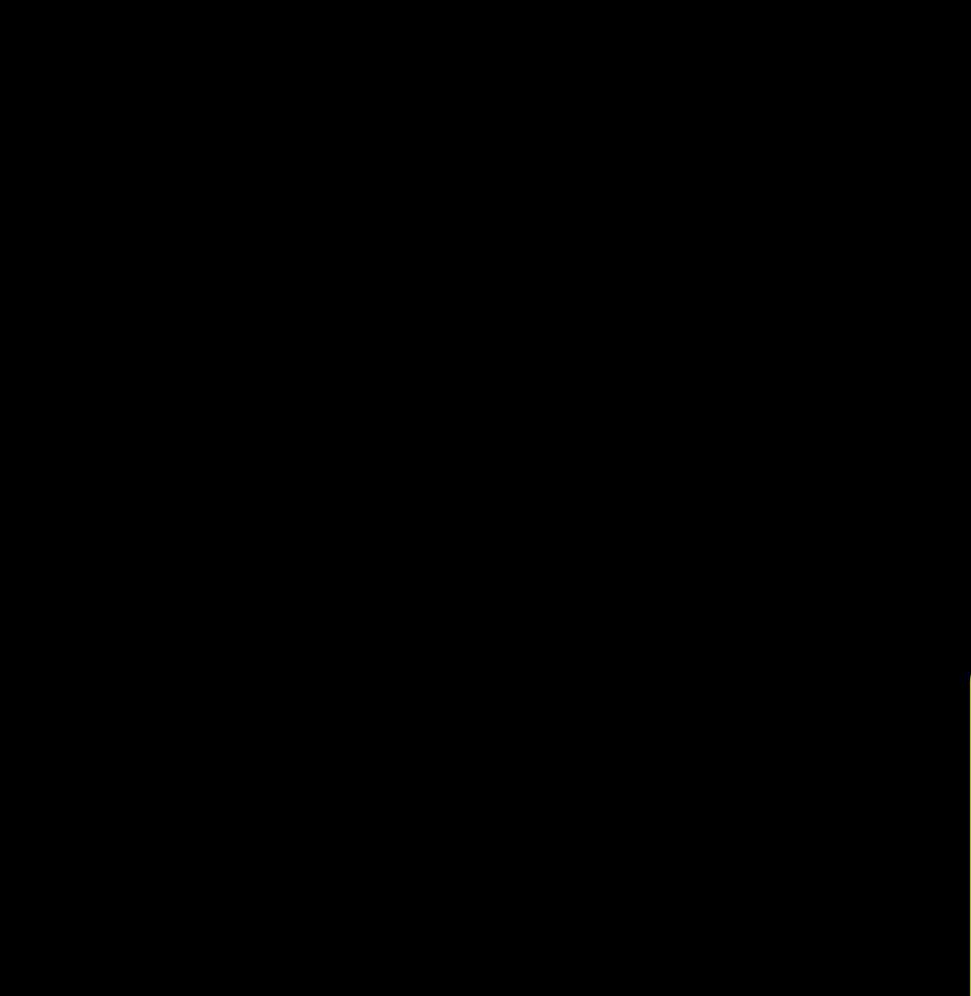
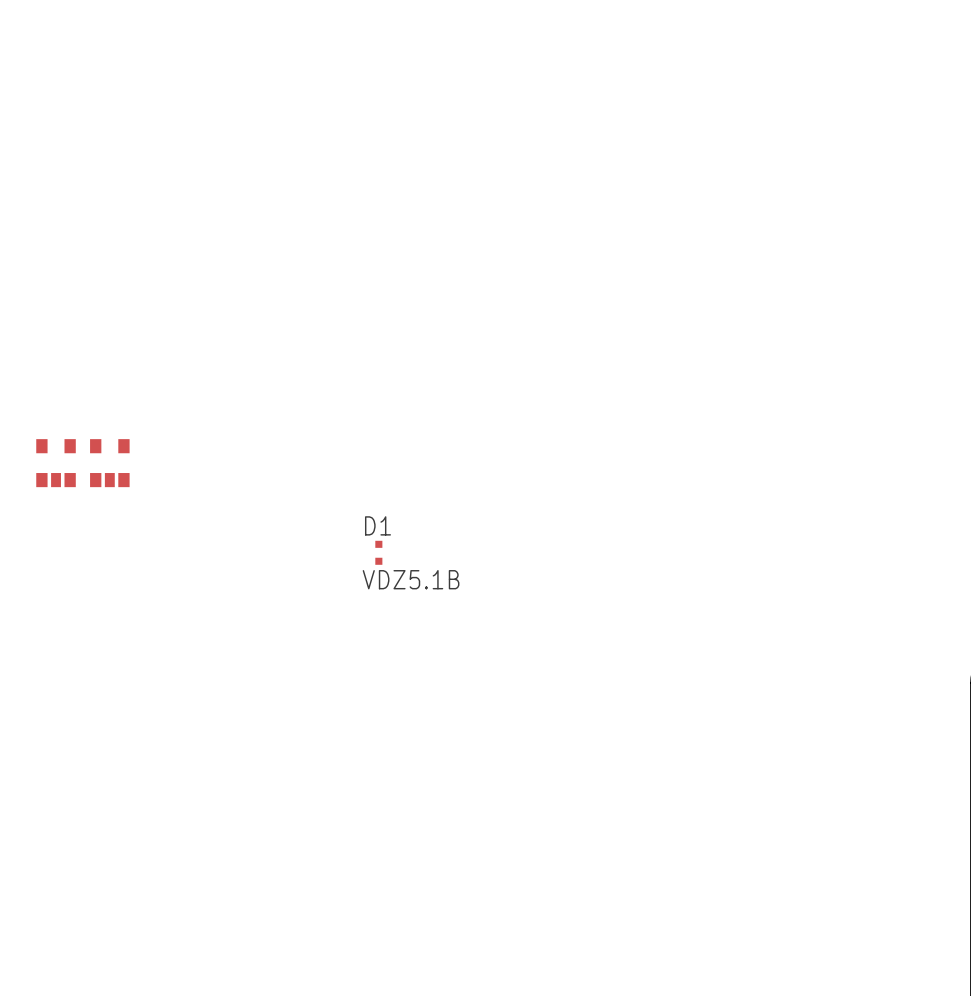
part: none -> (56, 463)
part: none -> (109, 463)
D1: none -> VDZ5.1B (378, 552)

